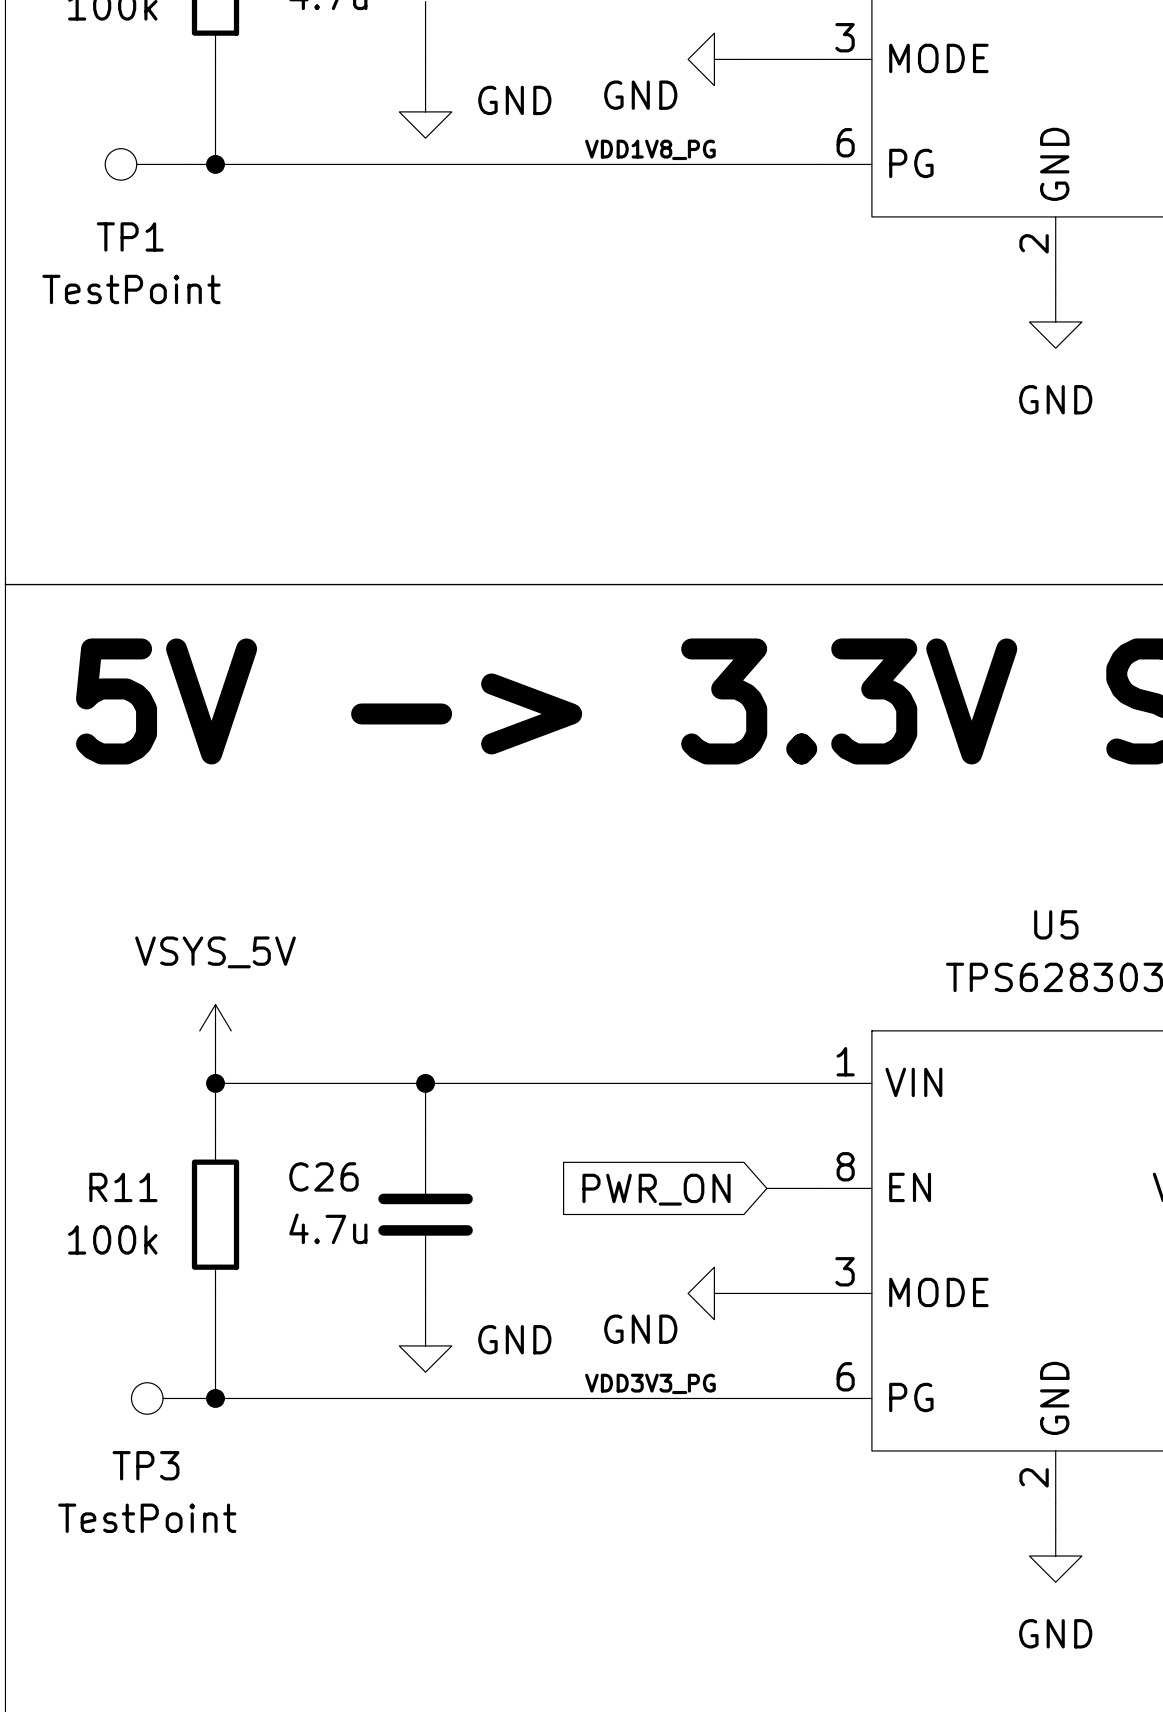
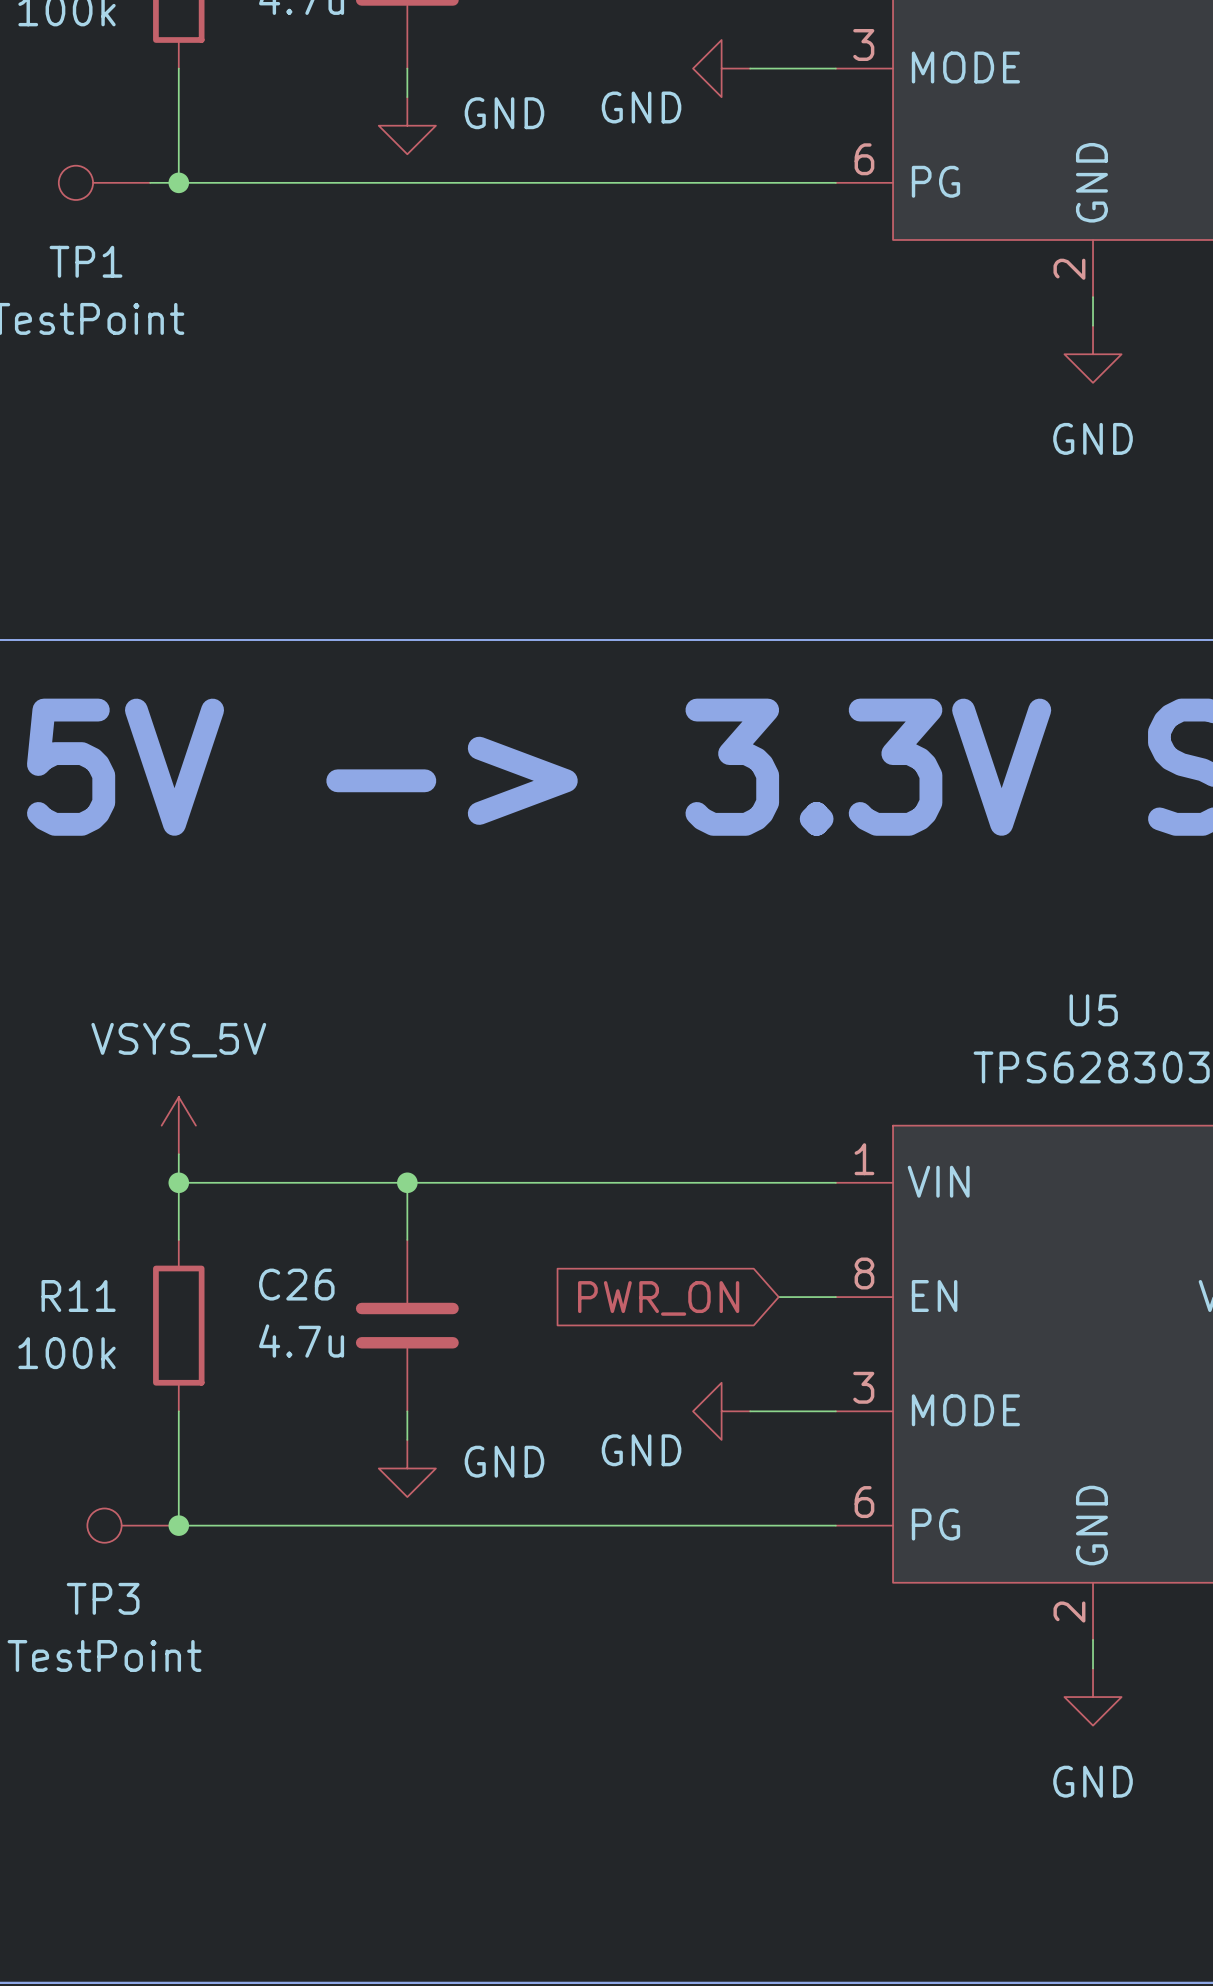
label: VDD1V8_PG (650, 149) -> none
label: VDD3V3_PG (650, 1383) -> none

